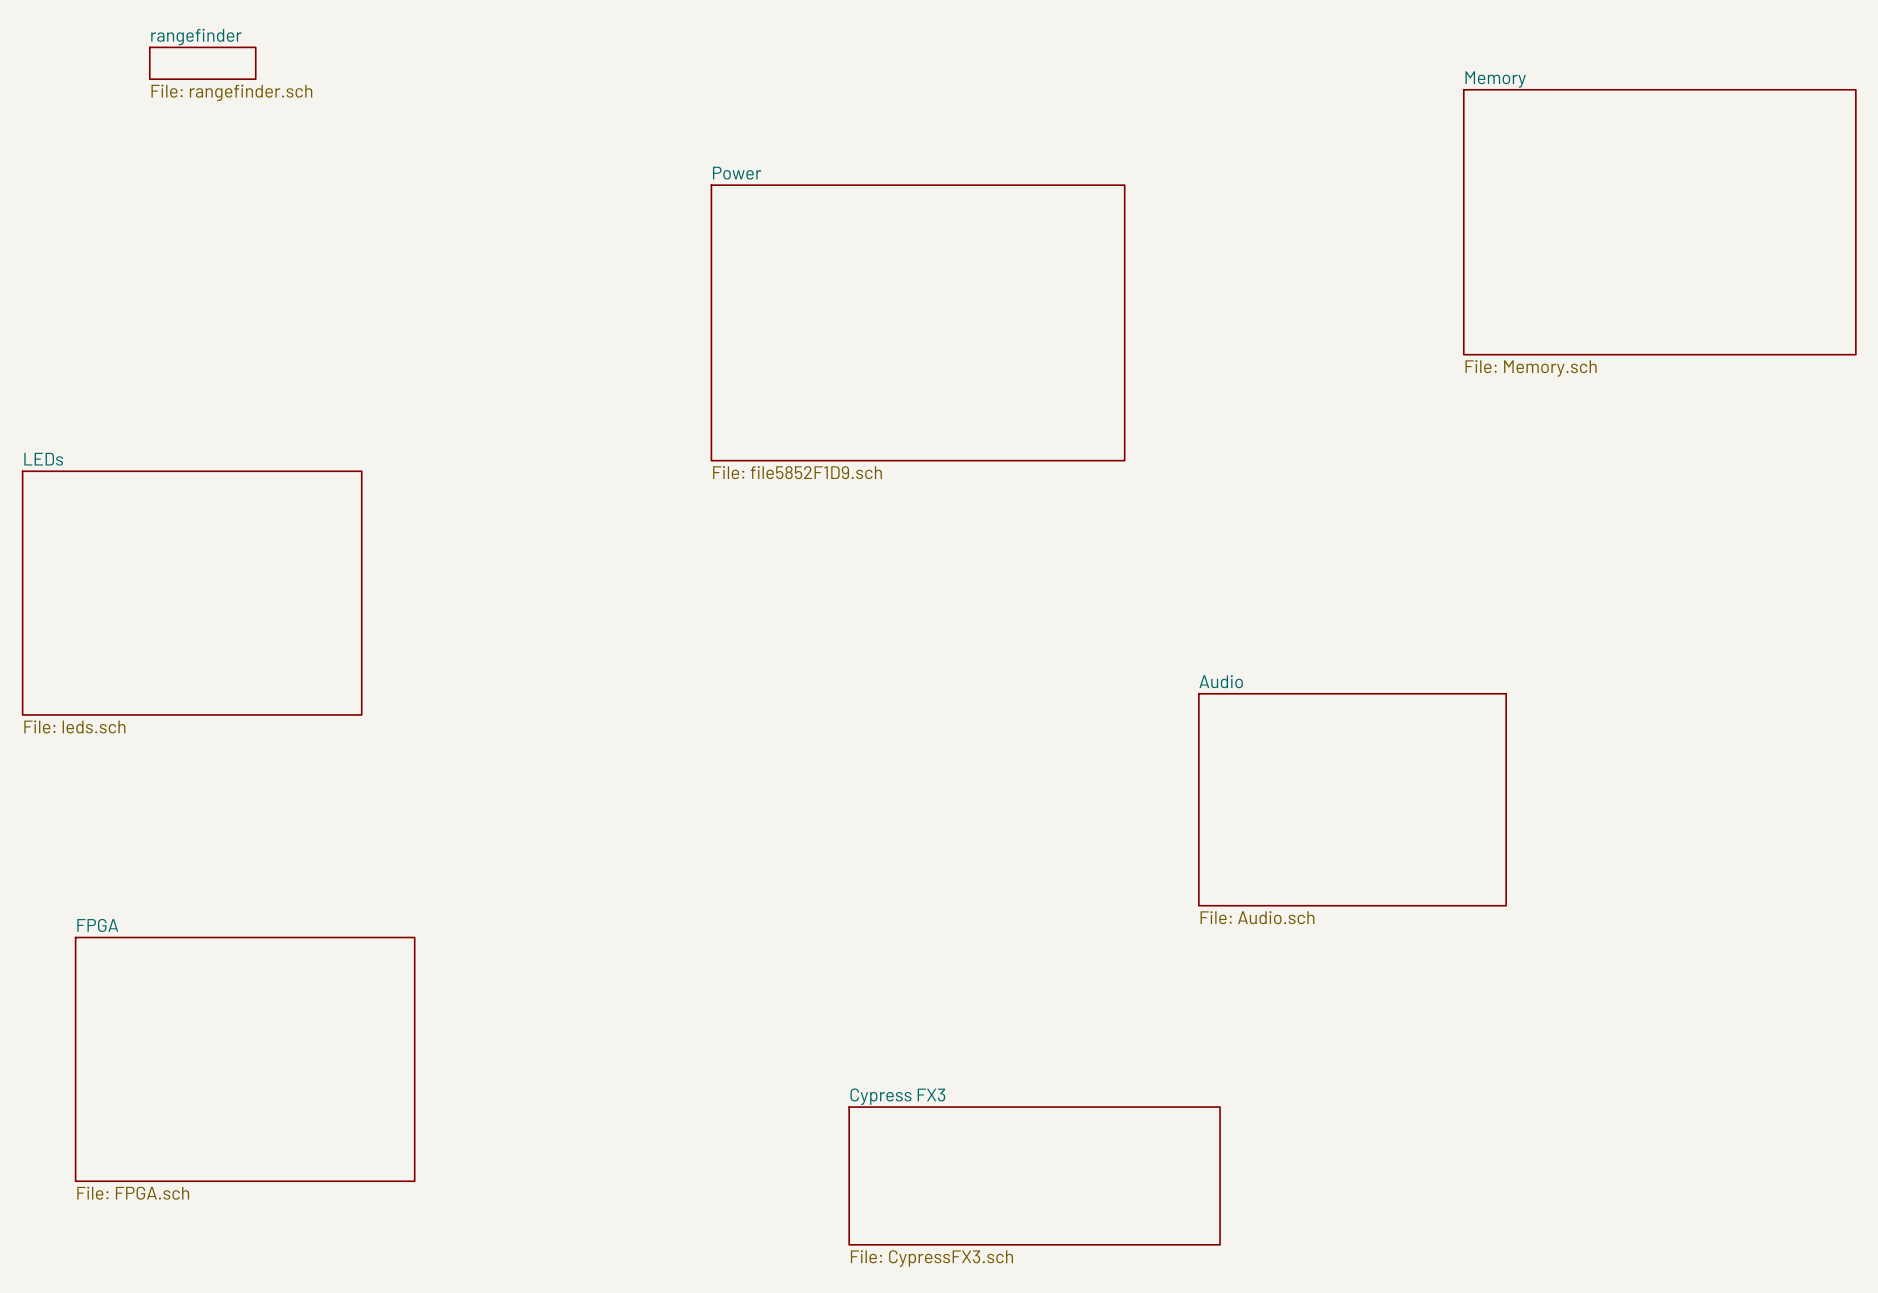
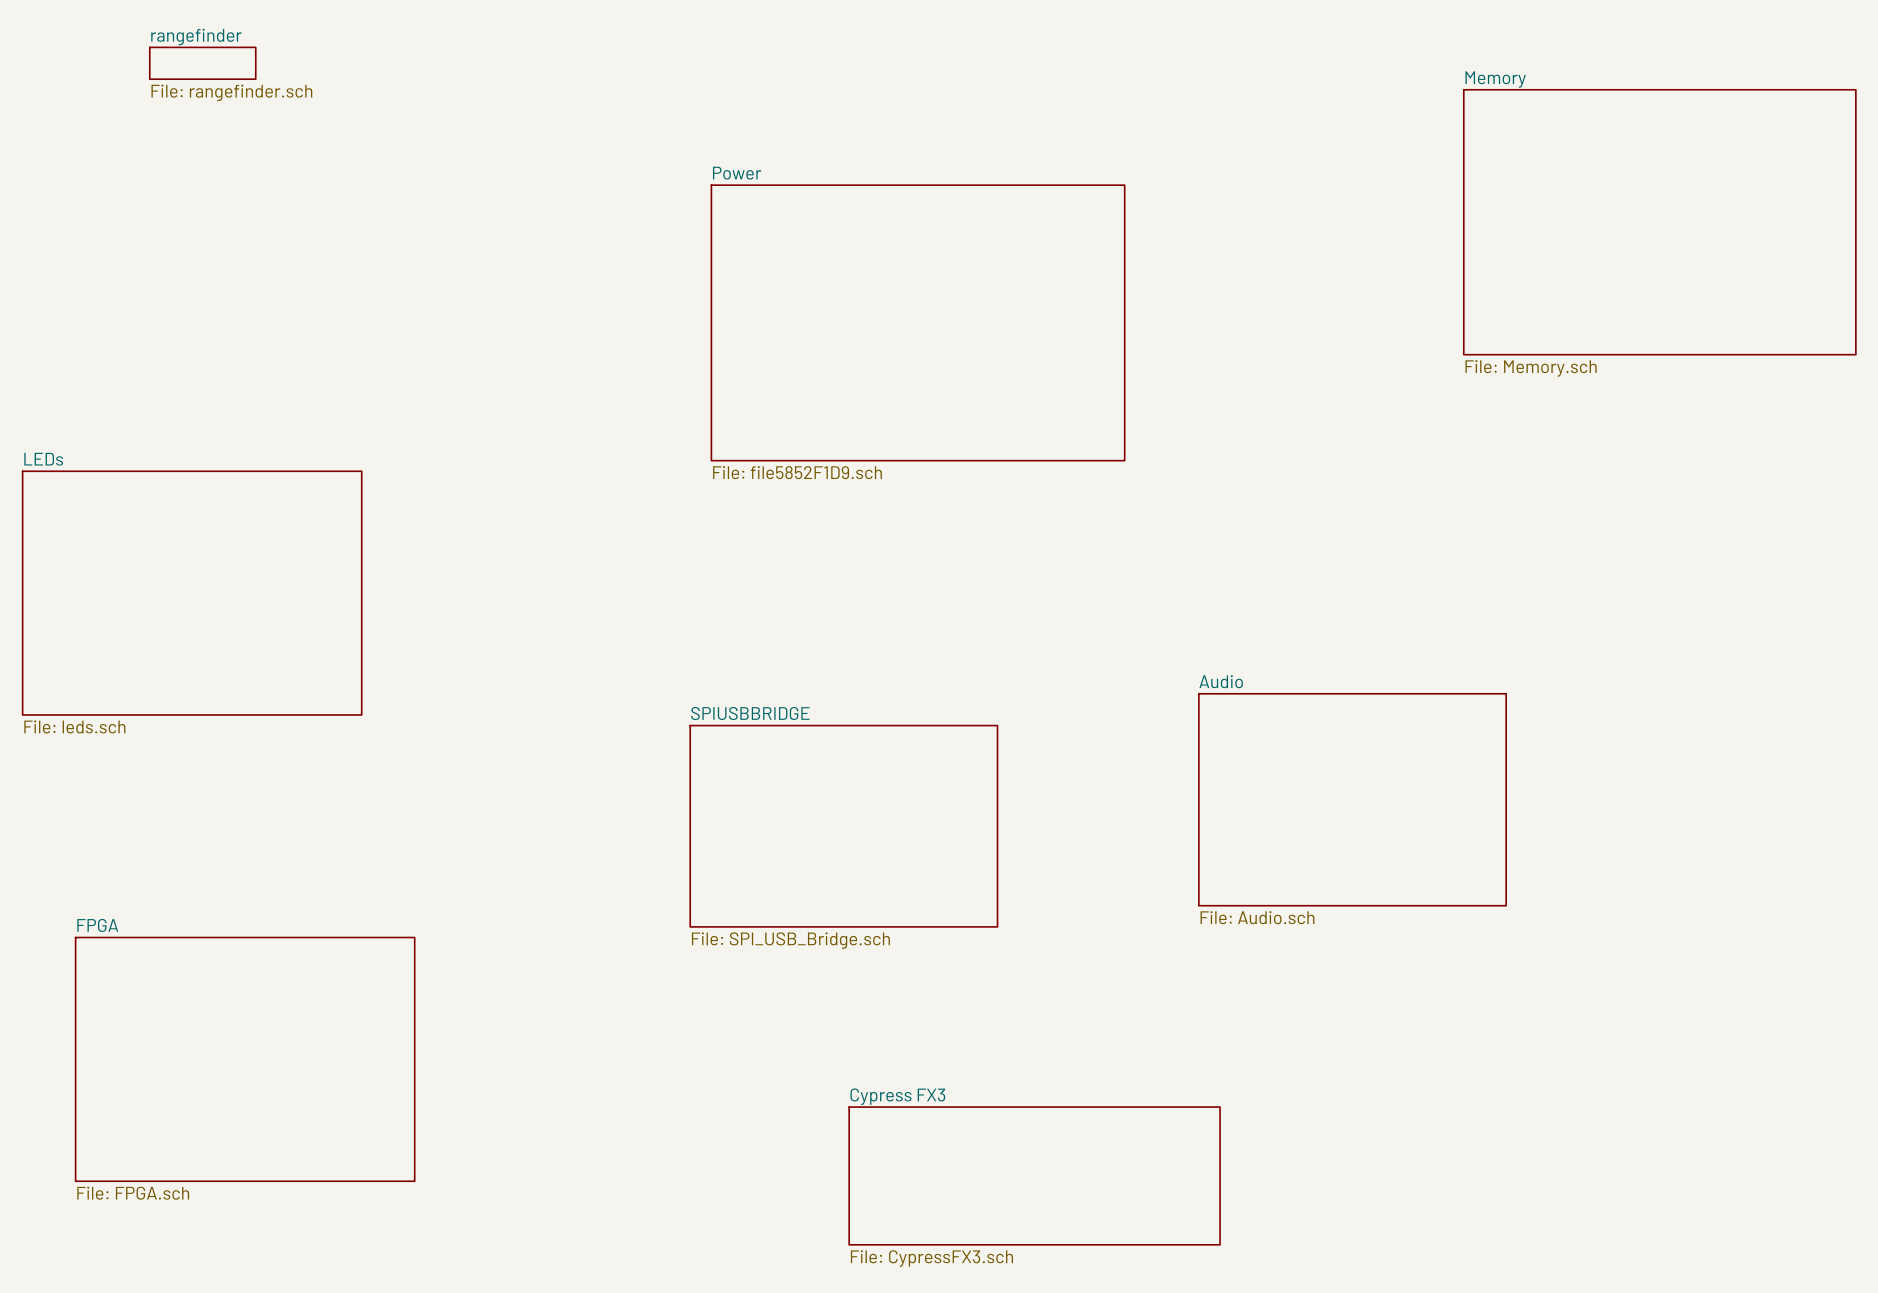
sheet SPIUSBBRIDGE: none -> File: SPI_USB_Bridge.sch (843, 826)

